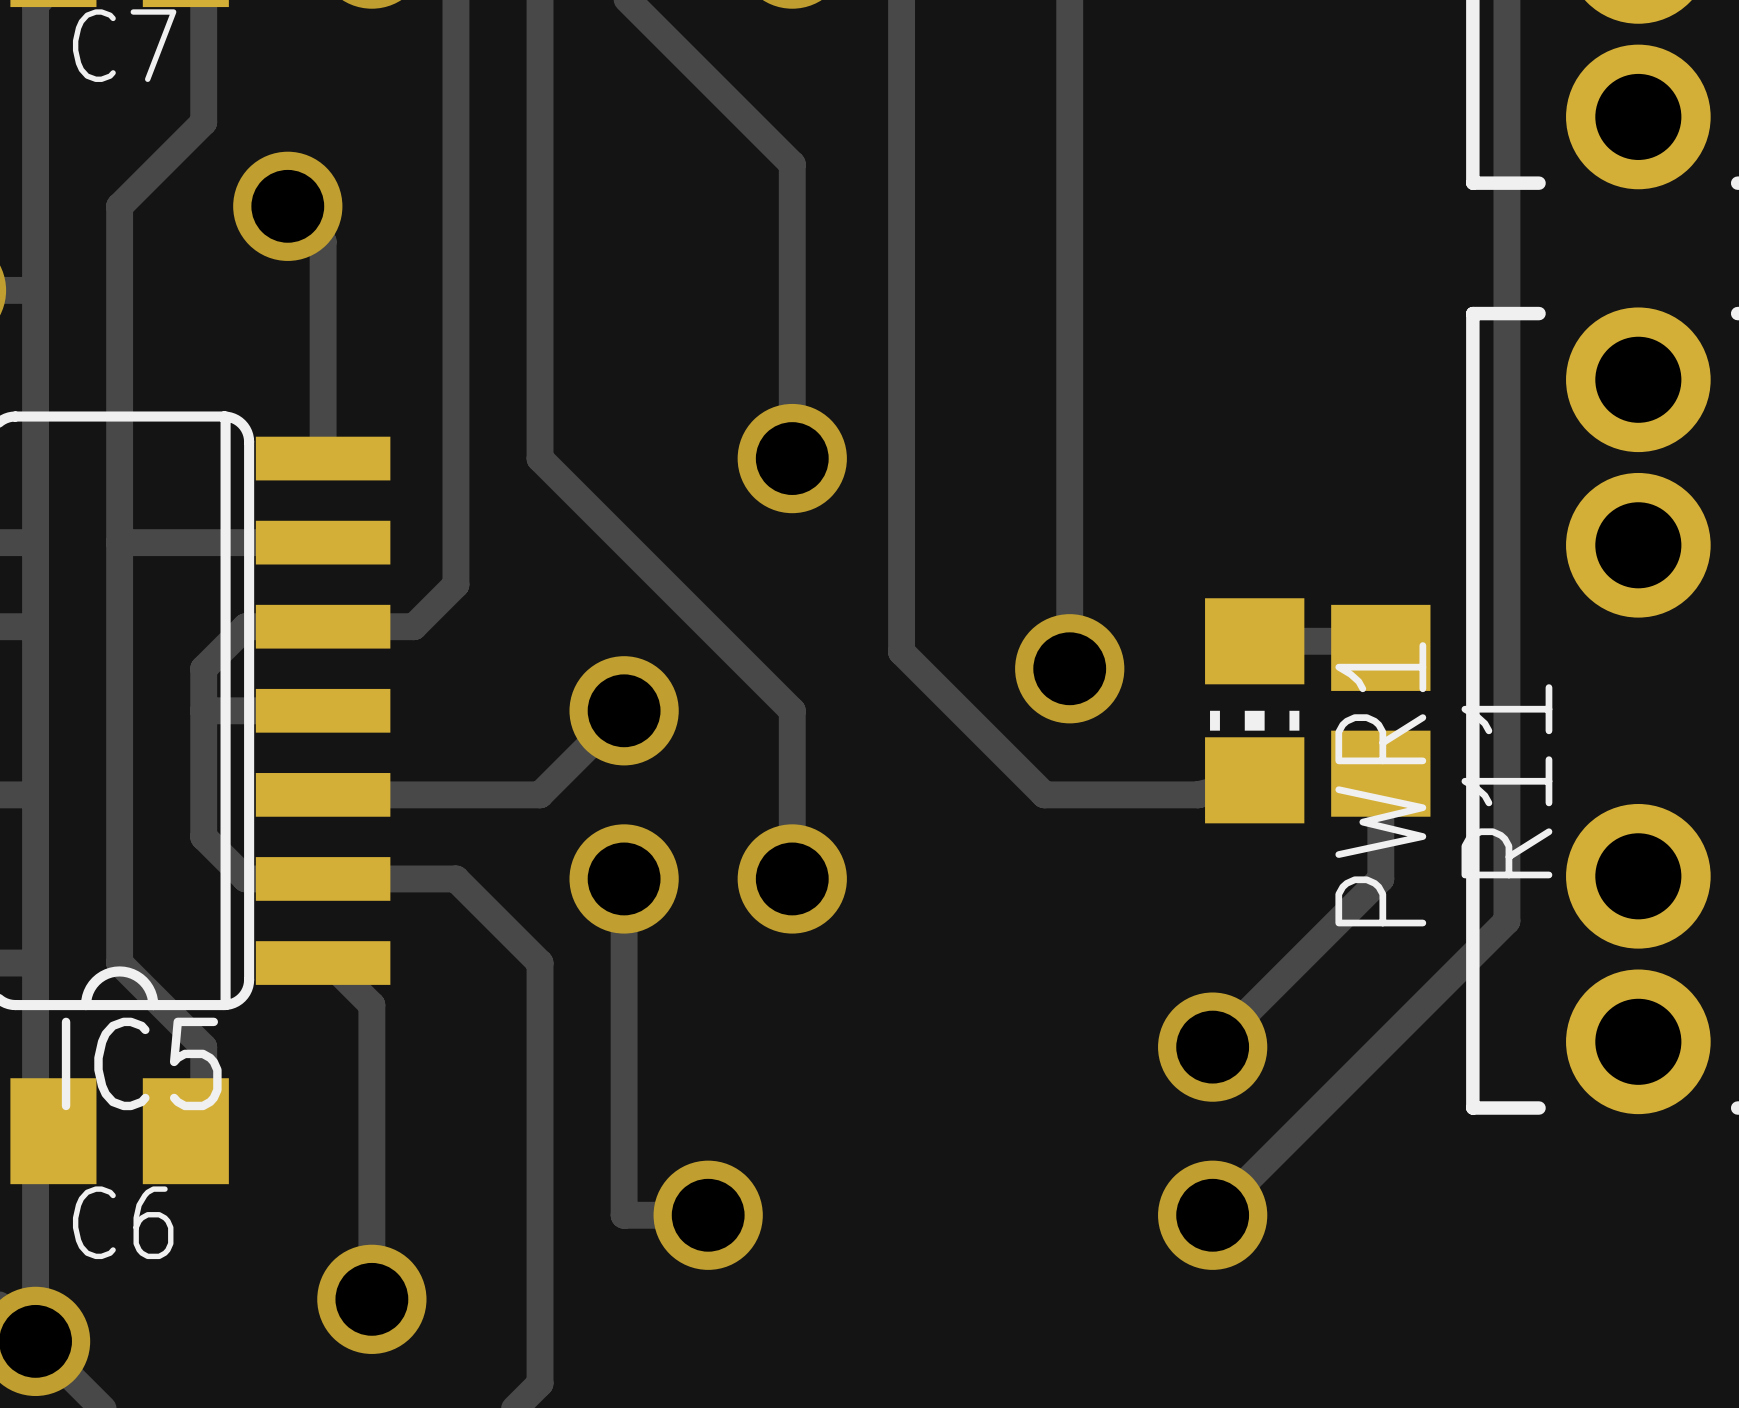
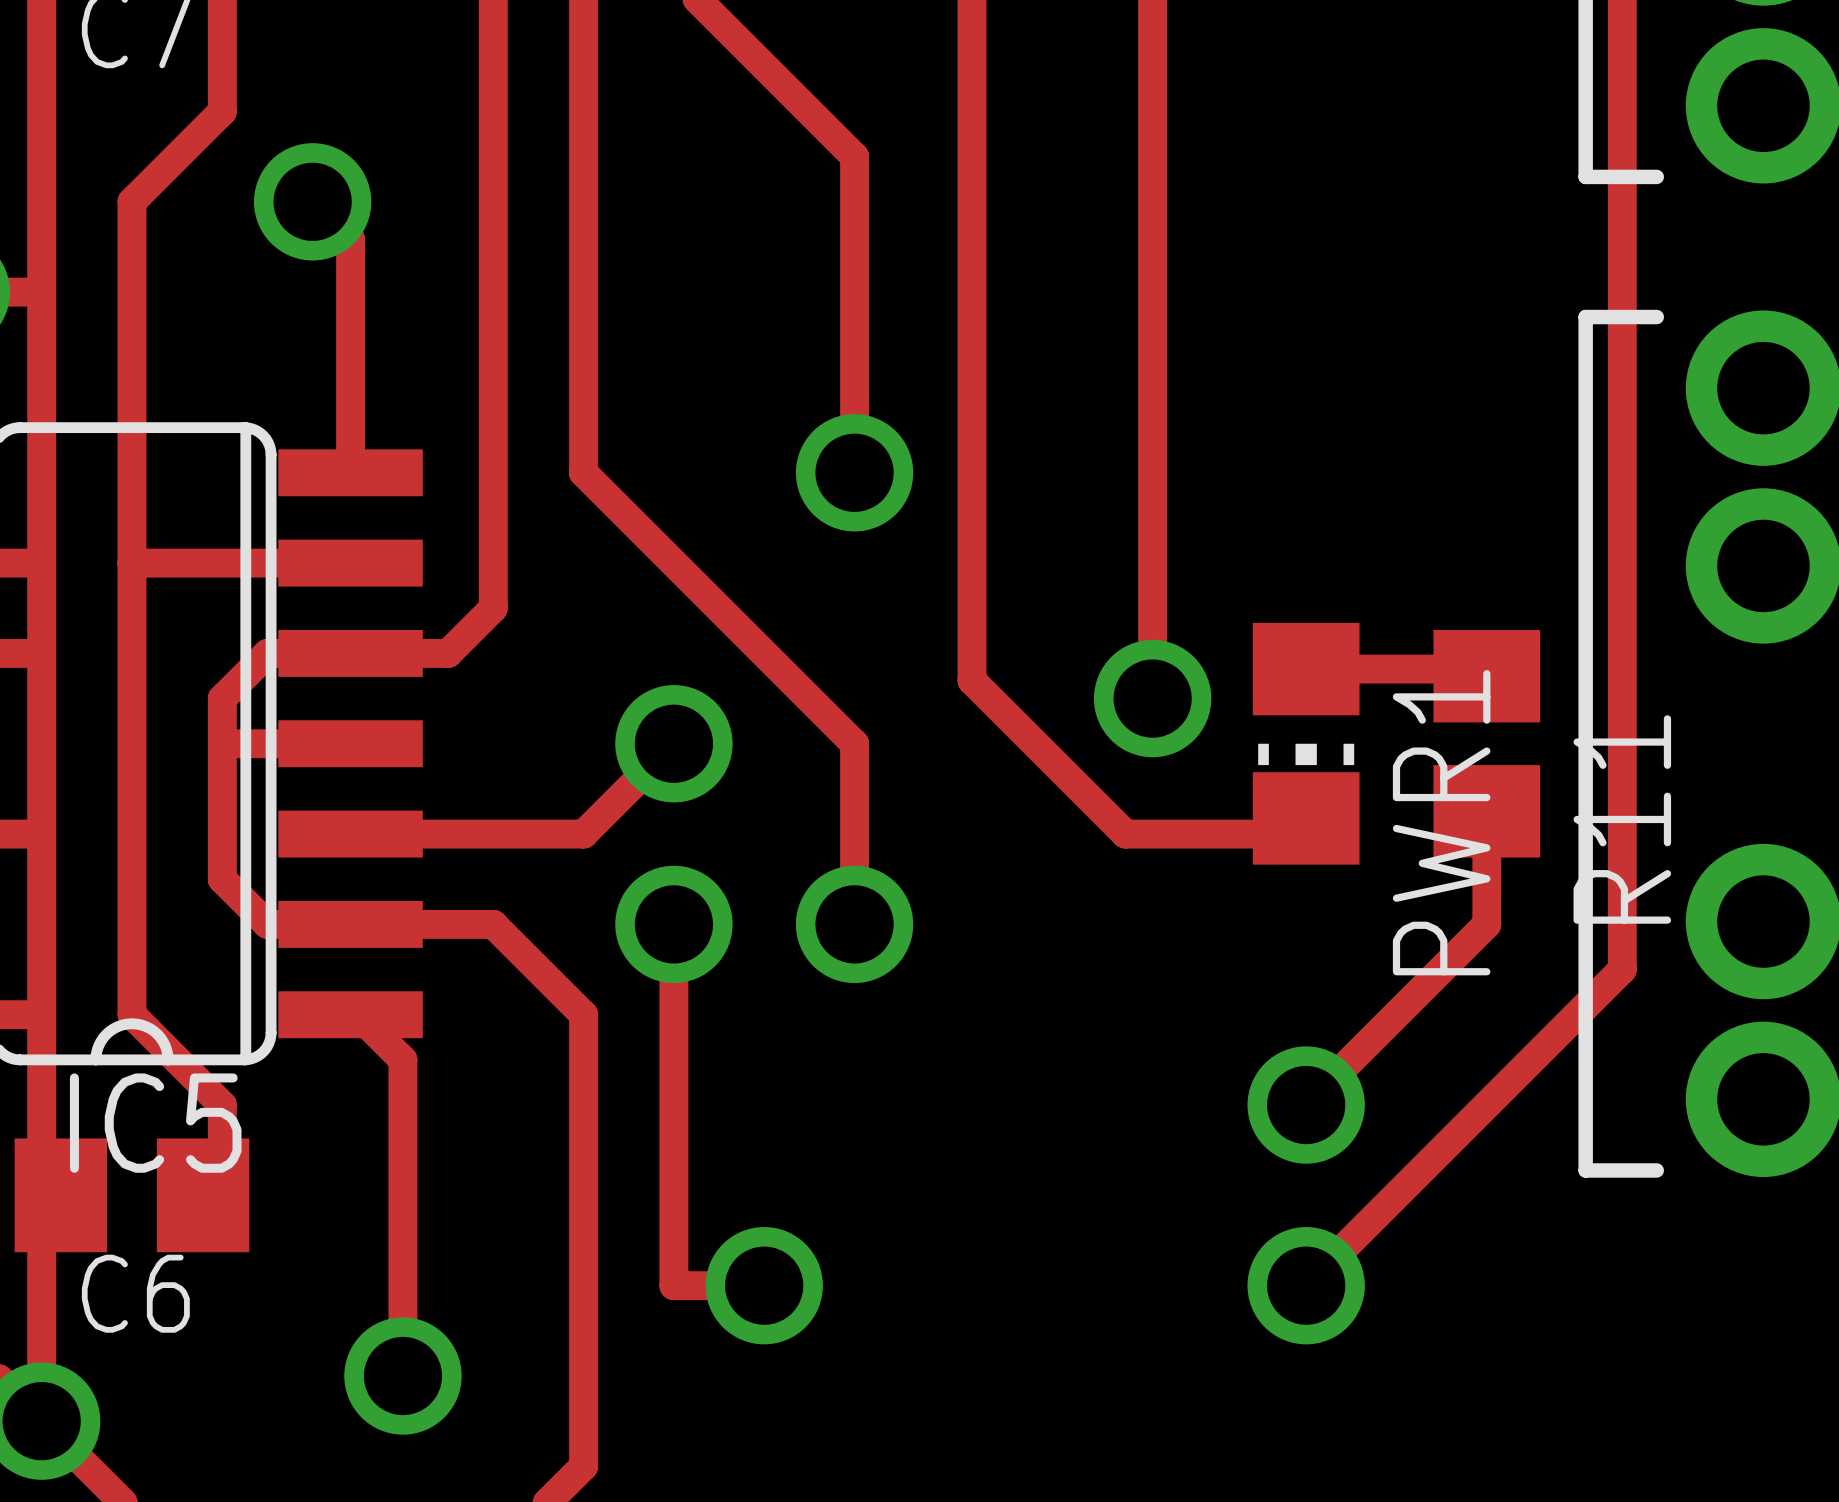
PWR1 position: (1254, 710) -> (1306, 743)

